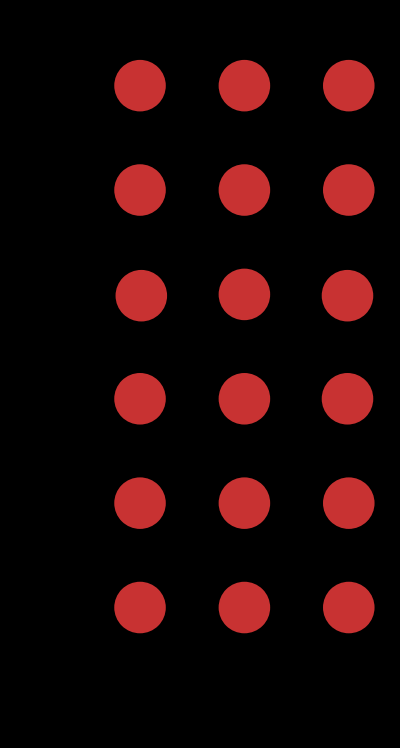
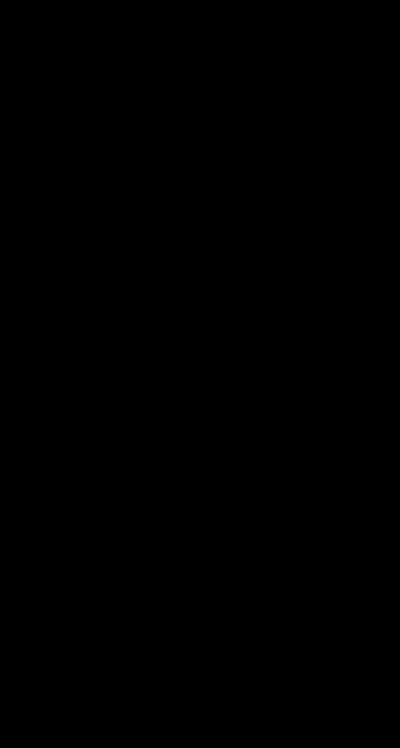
part: (140, 85) -> none
part: (244, 85) -> none
part: (348, 85) -> none
part: (140, 190) -> none
part: (244, 190) -> none
part: (348, 190) -> none
part: (244, 294) -> none
part: (141, 295) -> none
part: (347, 295) -> none
part: (140, 398) -> none
part: (244, 398) -> none
part: (347, 398) -> none
part: (140, 503) -> none
part: (244, 503) -> none
part: (348, 503) -> none
part: (140, 607) -> none
part: (244, 607) -> none
part: (348, 607) -> none

